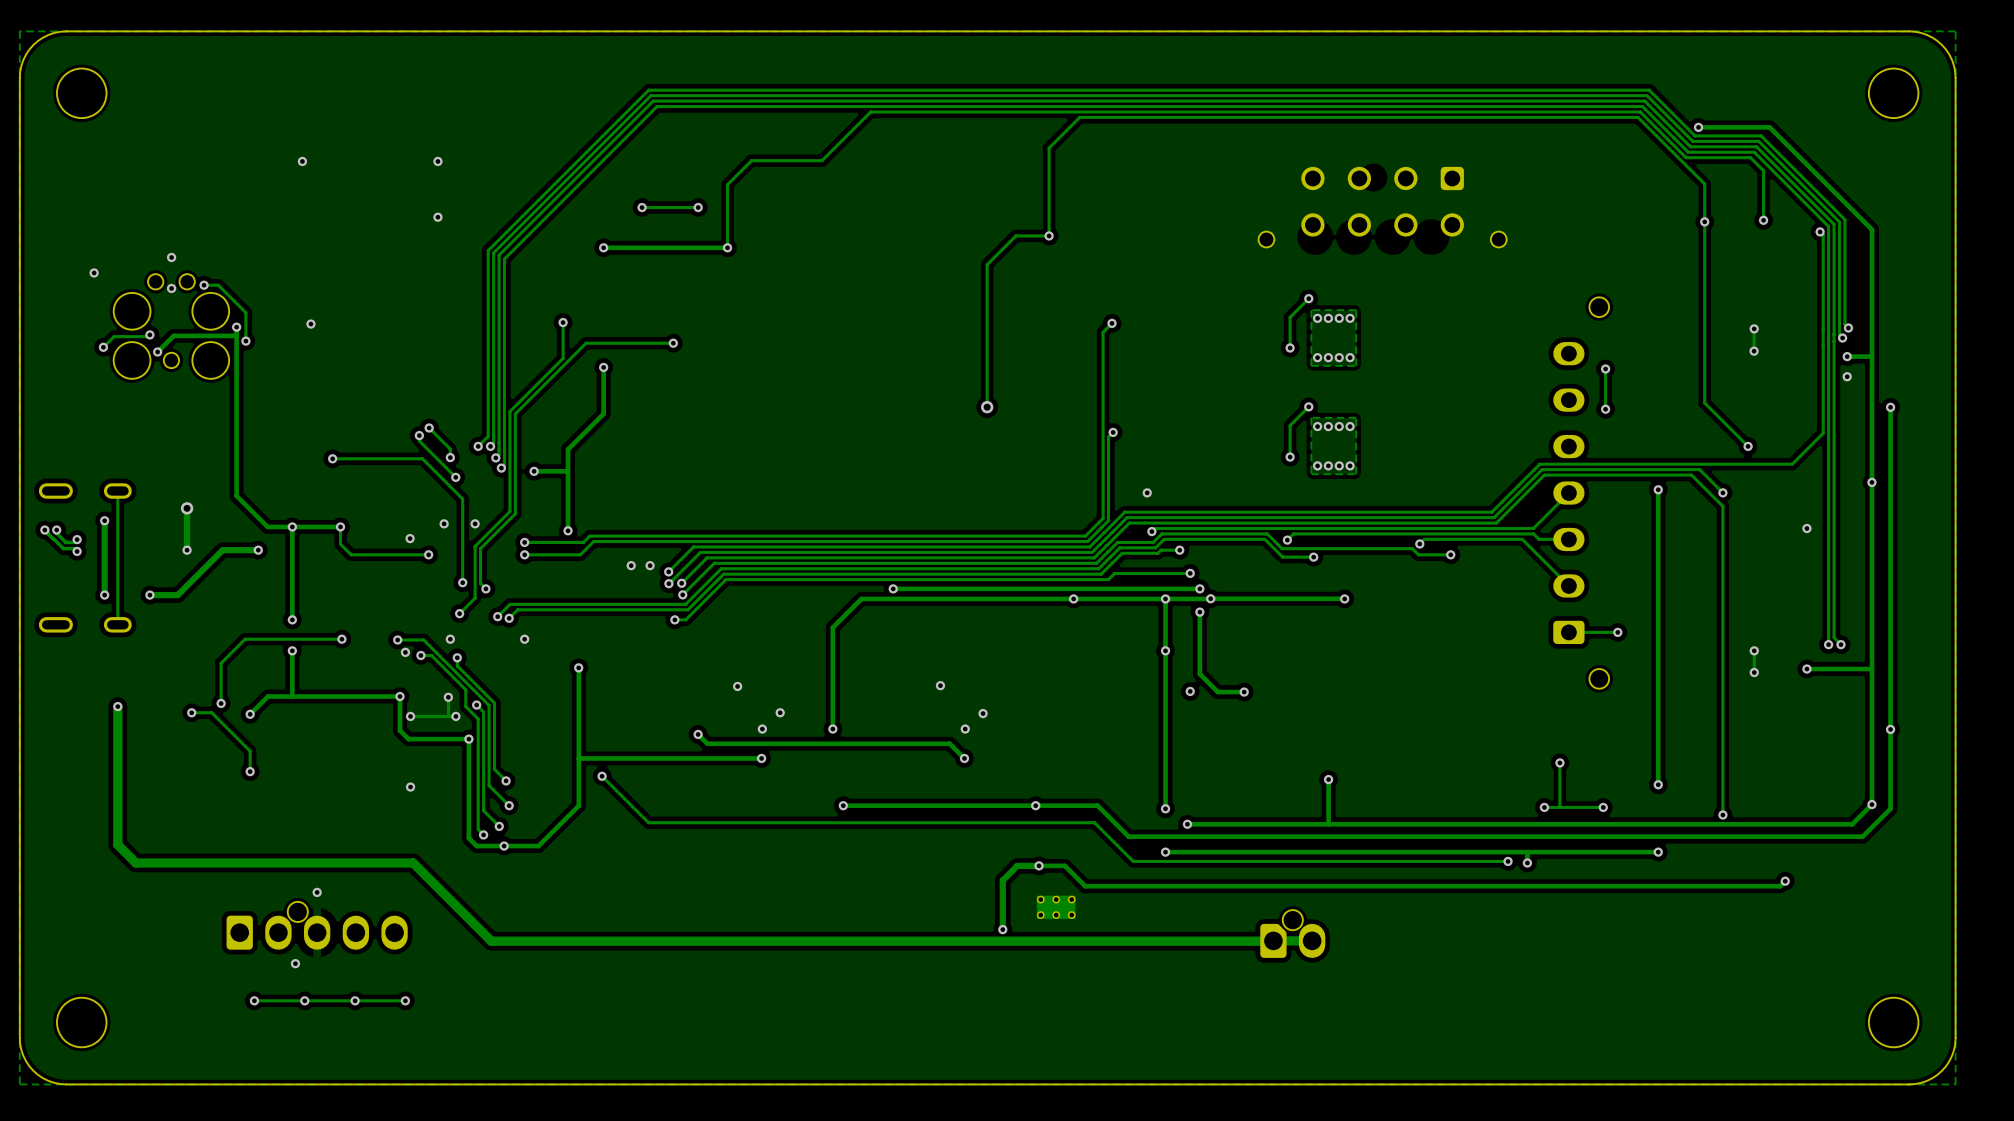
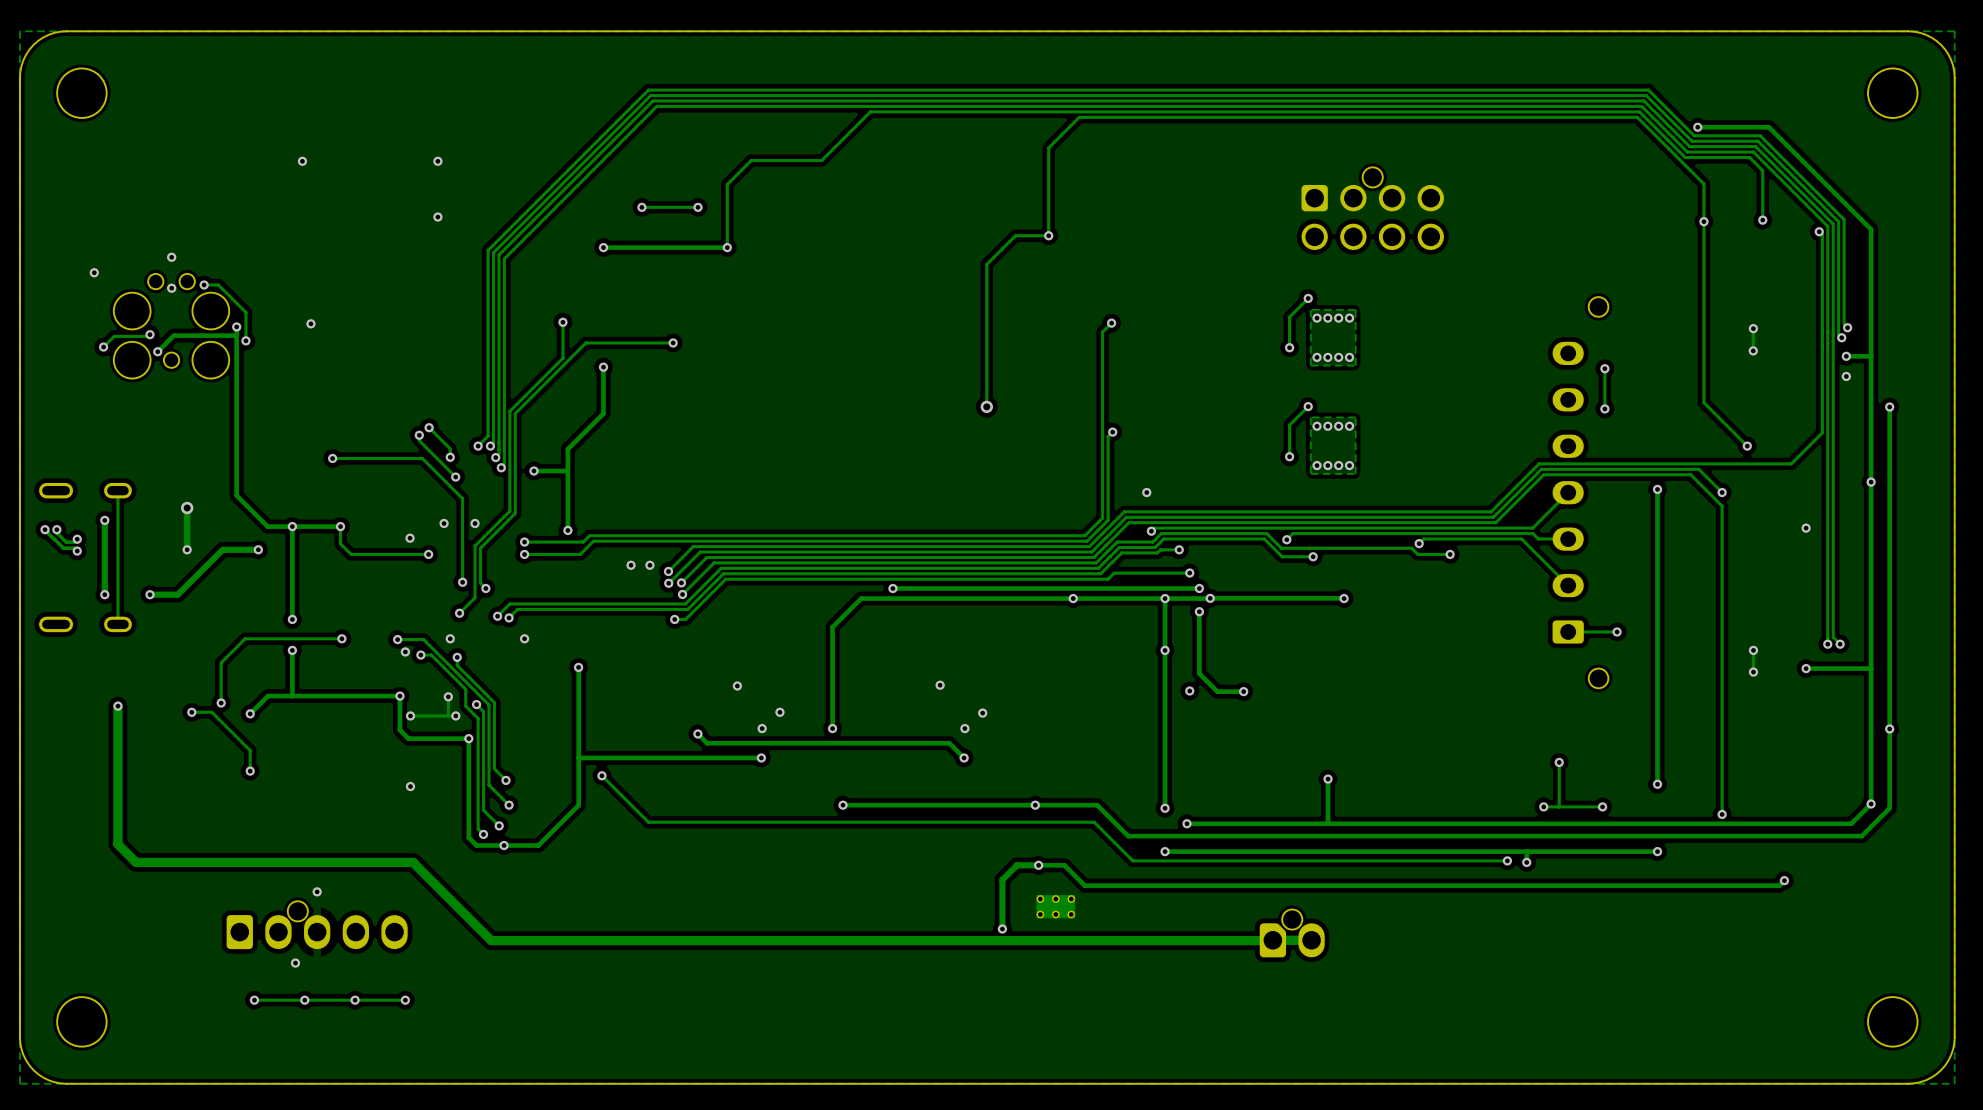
part footprint: [1258, 166, 1507, 248] -> [1301, 167, 1444, 251]

